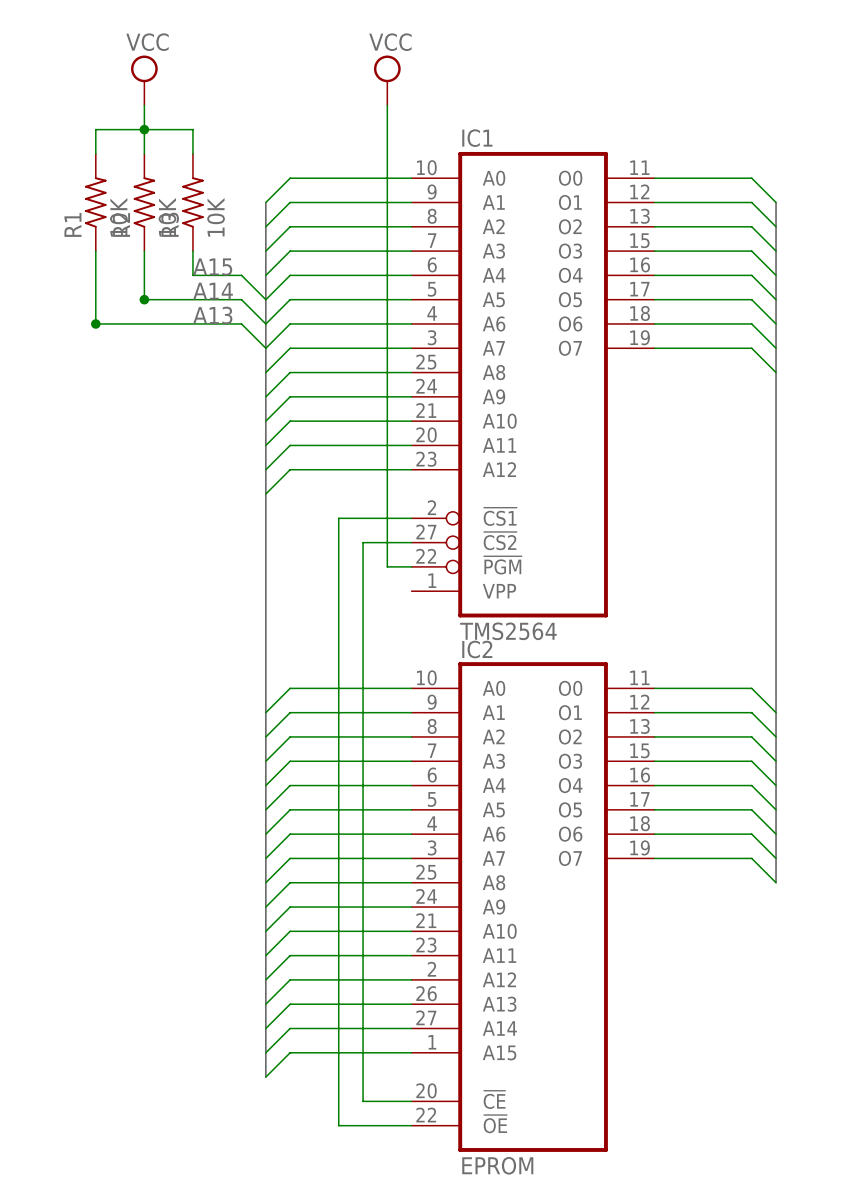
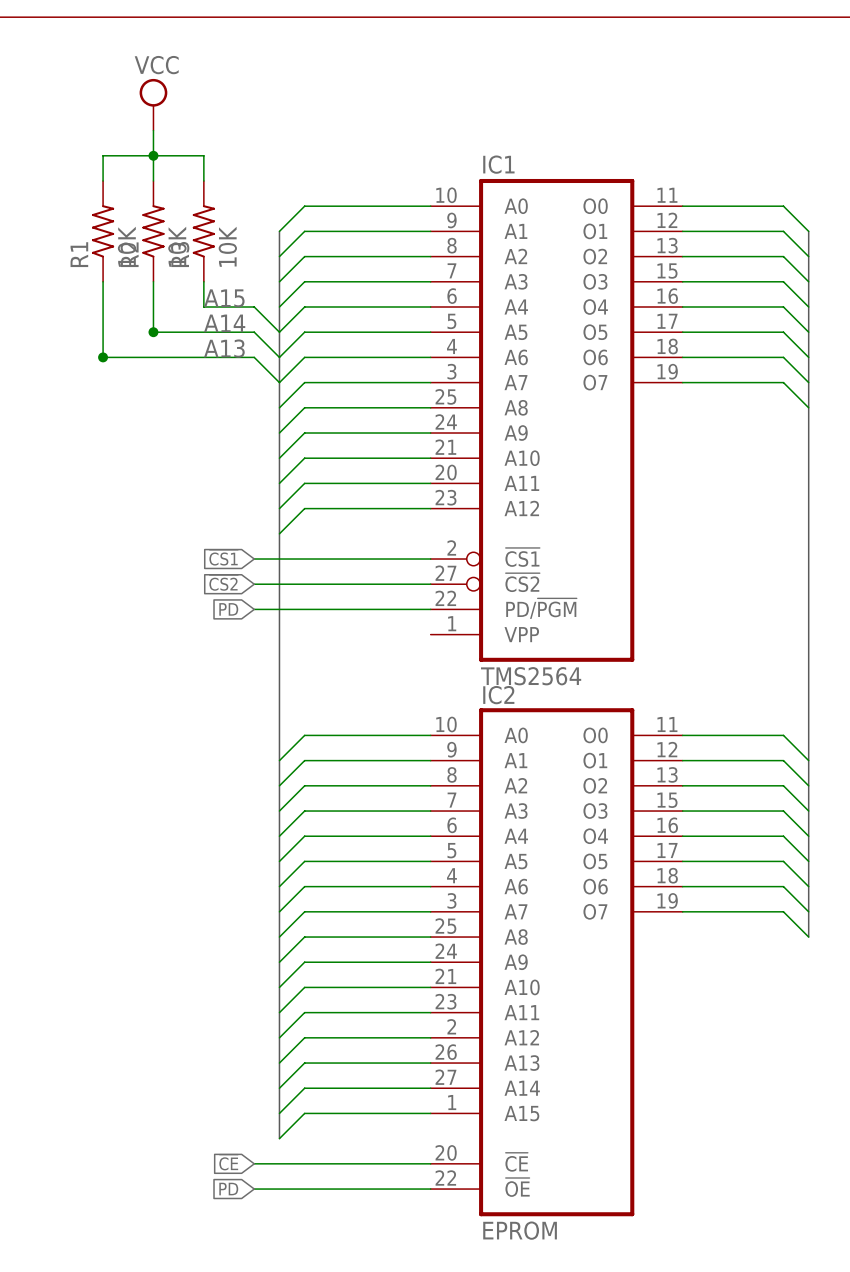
power symbol: VCC (387, 80) -> none
wire: (387, 105) (387, 566) -> (254, 609) (405, 609)
IC1 symbol: [411, 151, 655, 618] -> [430, 178, 683, 662]
global label: none -> ~{CS1} (223, 557)
wire: (338, 518) (338, 1125) -> (355, 559) (254, 559)
global label: none -> ~{CS2} (223, 582)
wire: (363, 542) (363, 1101) -> (380, 584) (254, 584)
global label: none -> PD (228, 609)
global label: none -> ~{CE} (228, 1162)
wire: none -> (254, 1163) (380, 1163)
global label: none -> PD (228, 1189)
wire: none -> (254, 1189) (355, 1189)

